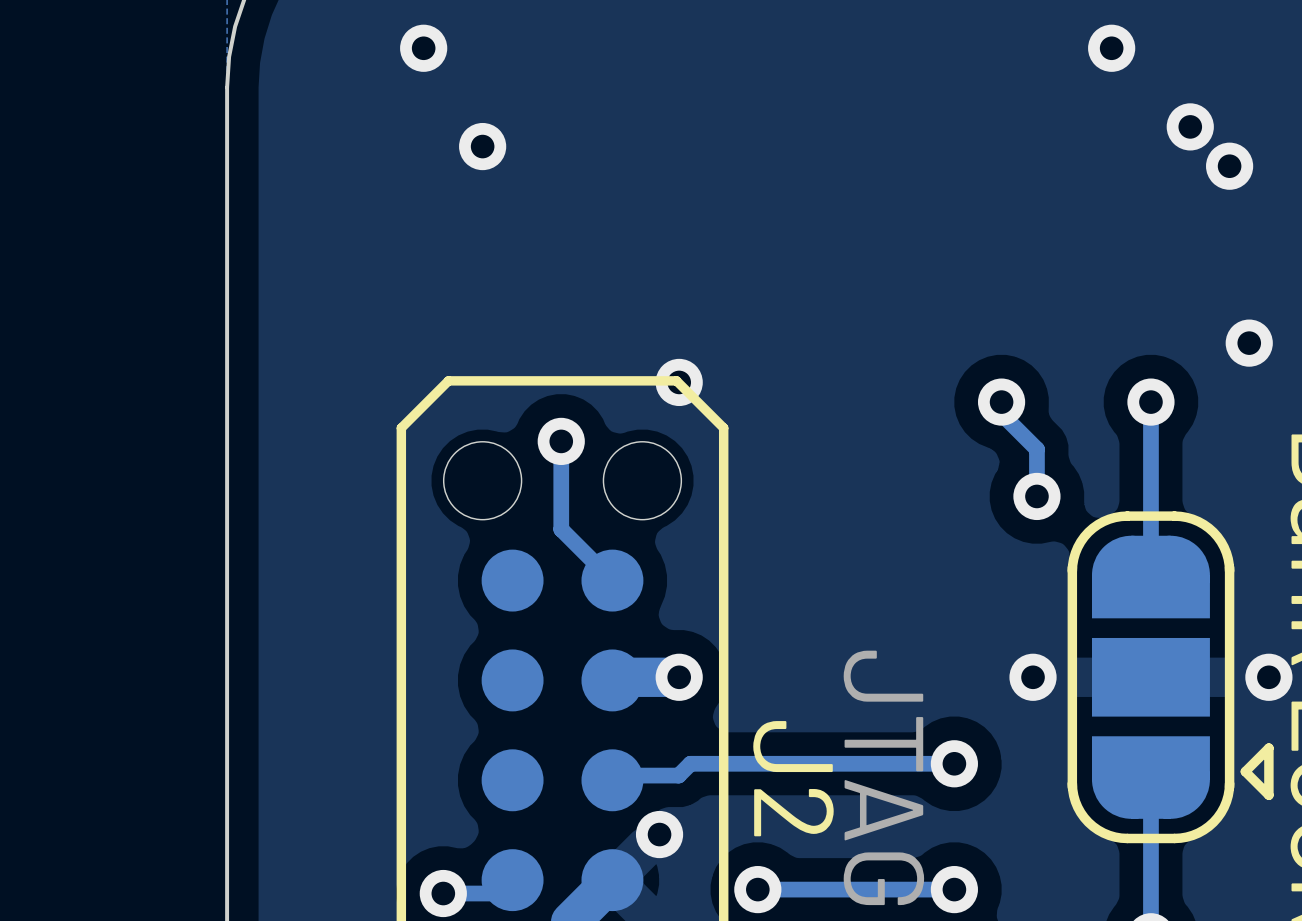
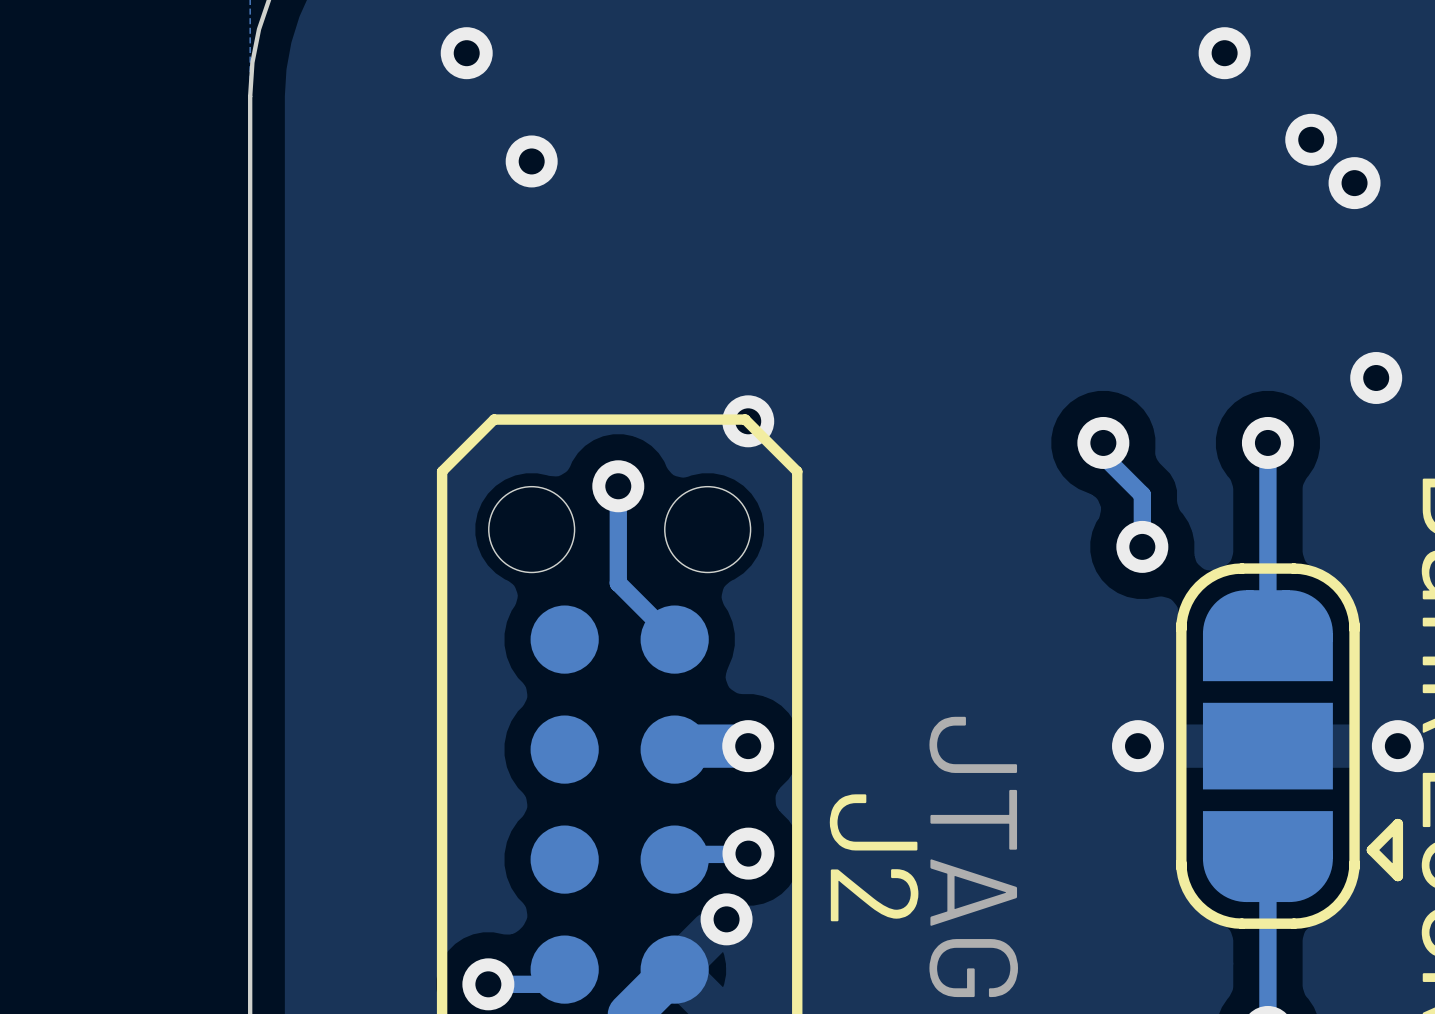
track: (954, 763) (690, 763) (679, 774) -> none
via: (954, 763) -> none
via: none -> (748, 853)
via: (757, 889) -> none
track: (954, 889) (757, 889) -> none
via: (954, 889) -> none

